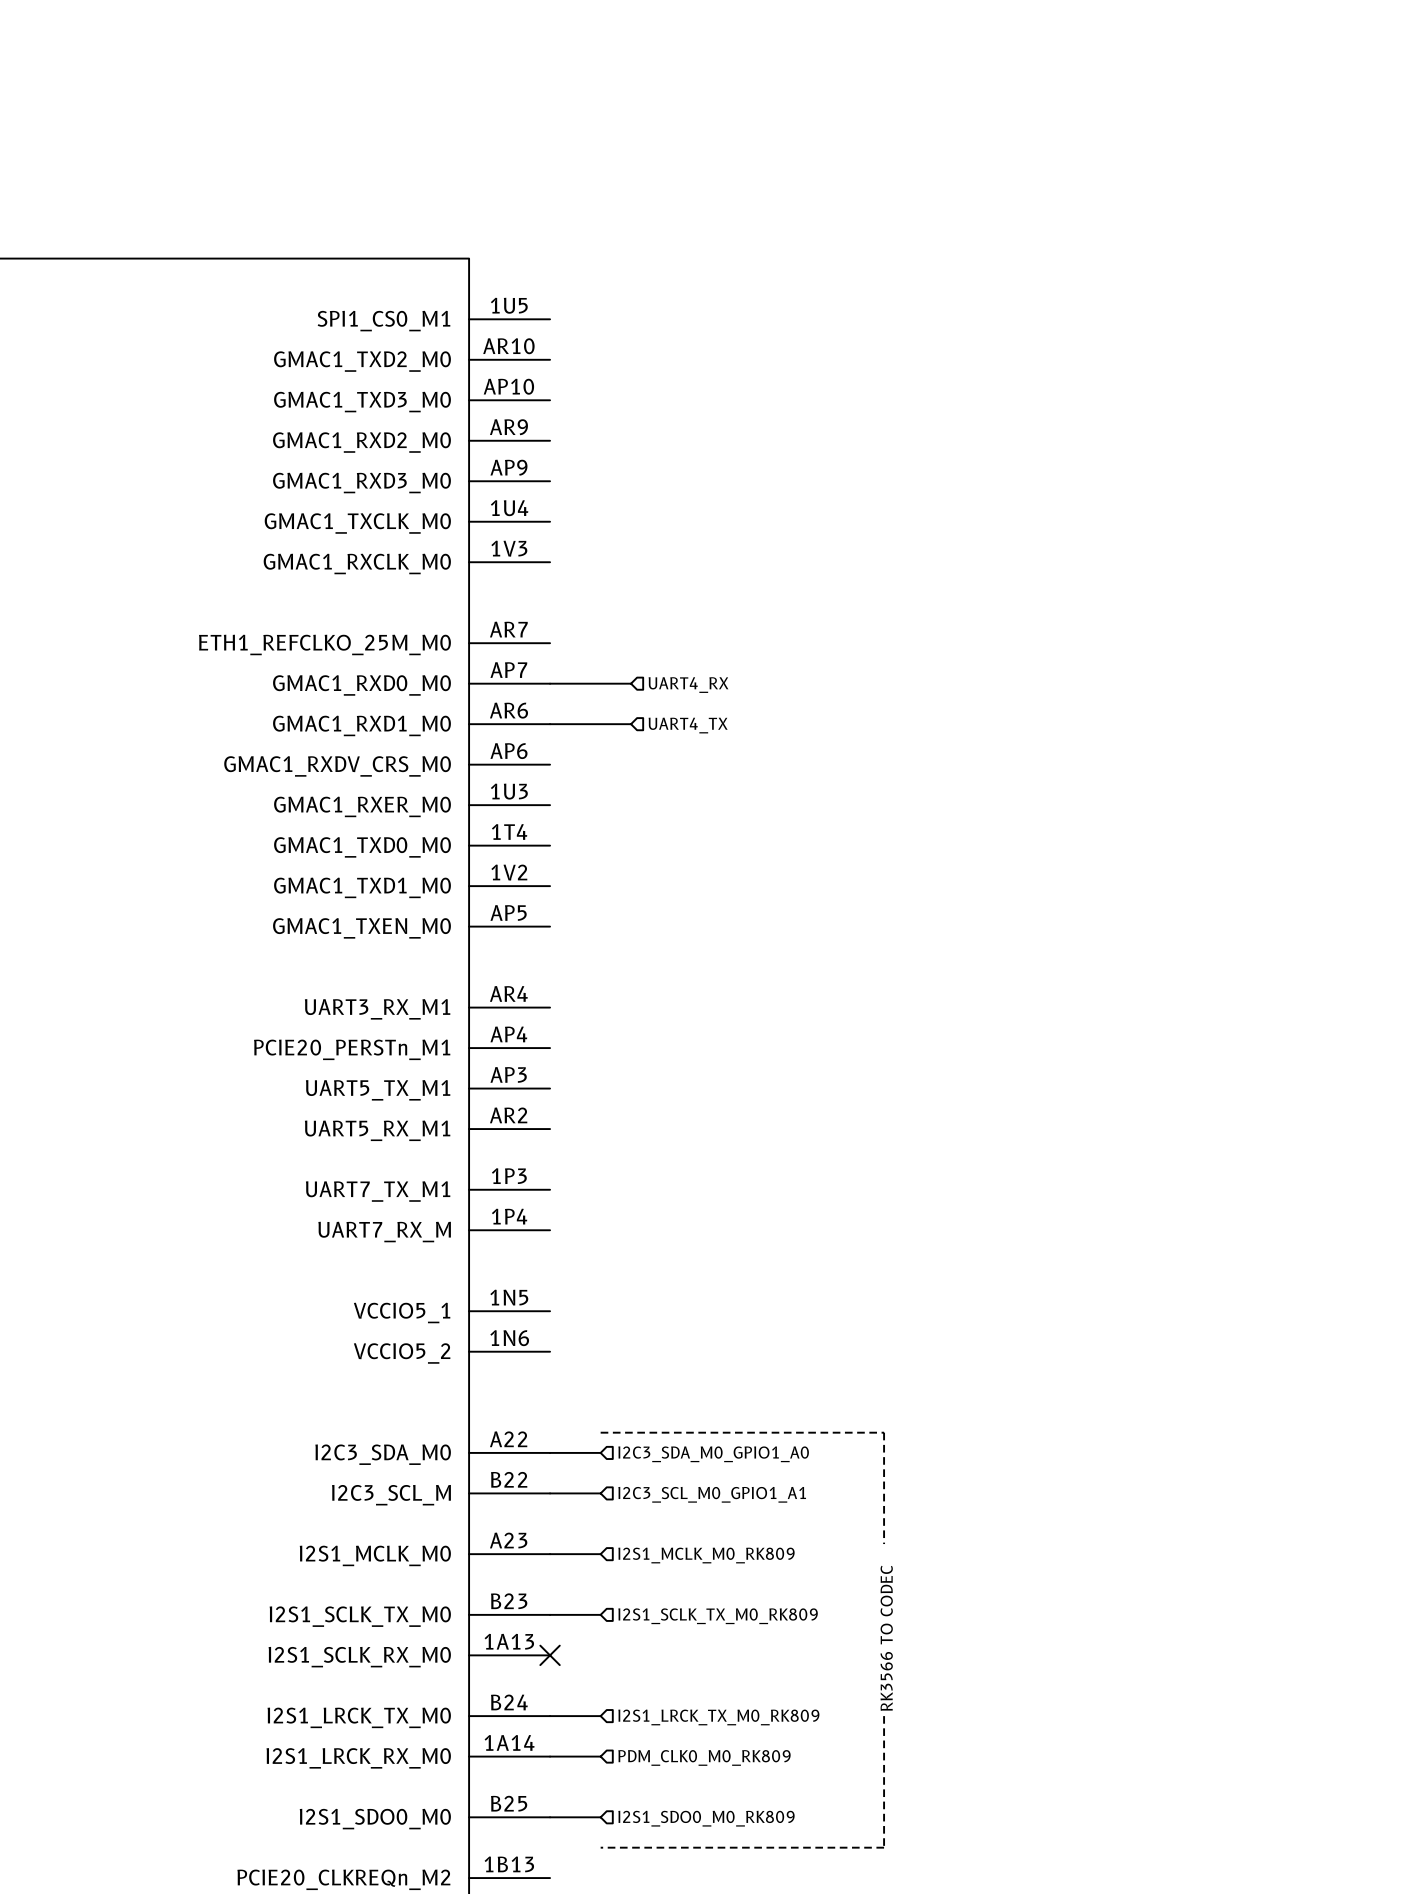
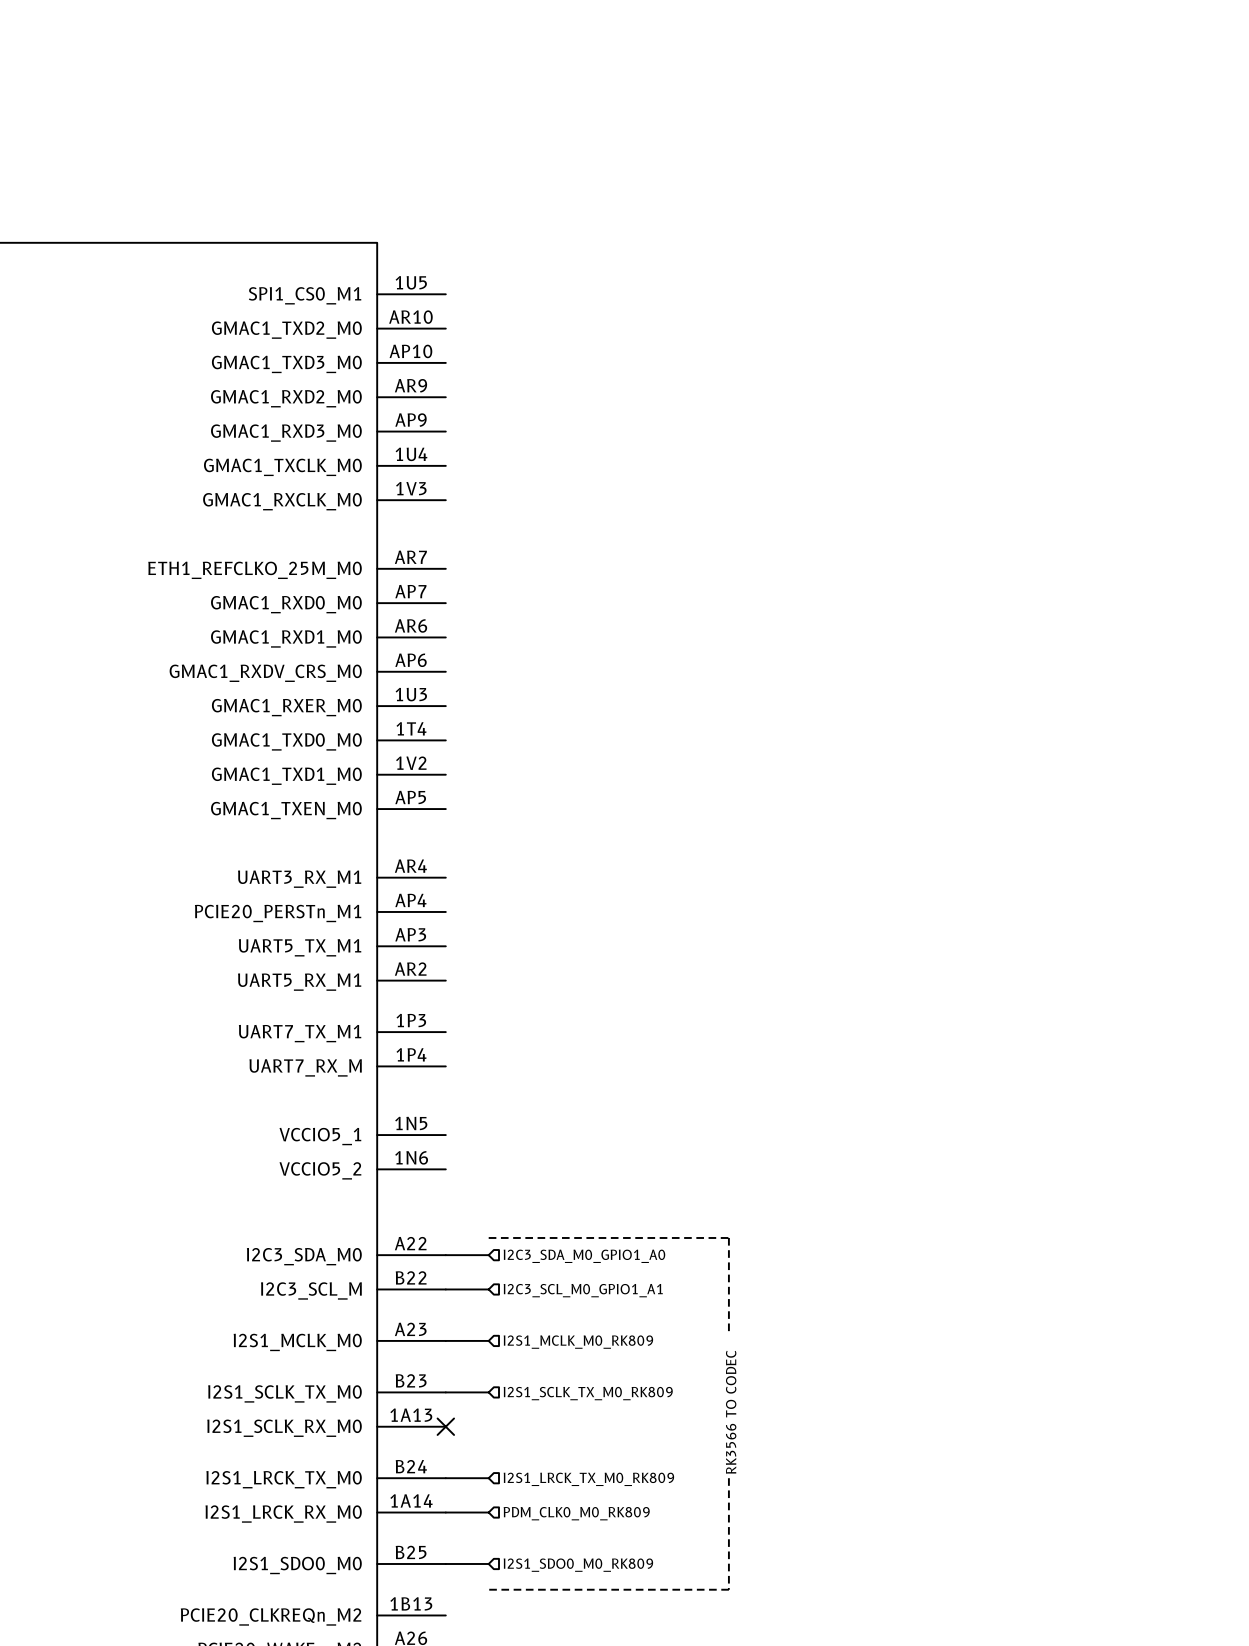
wire: (550, 683) (631, 683) -> none
hierarchical label: UART4_RX (688, 685) -> none
wire: (550, 724) (631, 724) -> none
hierarchical label: UART4_TX (688, 725) -> none

